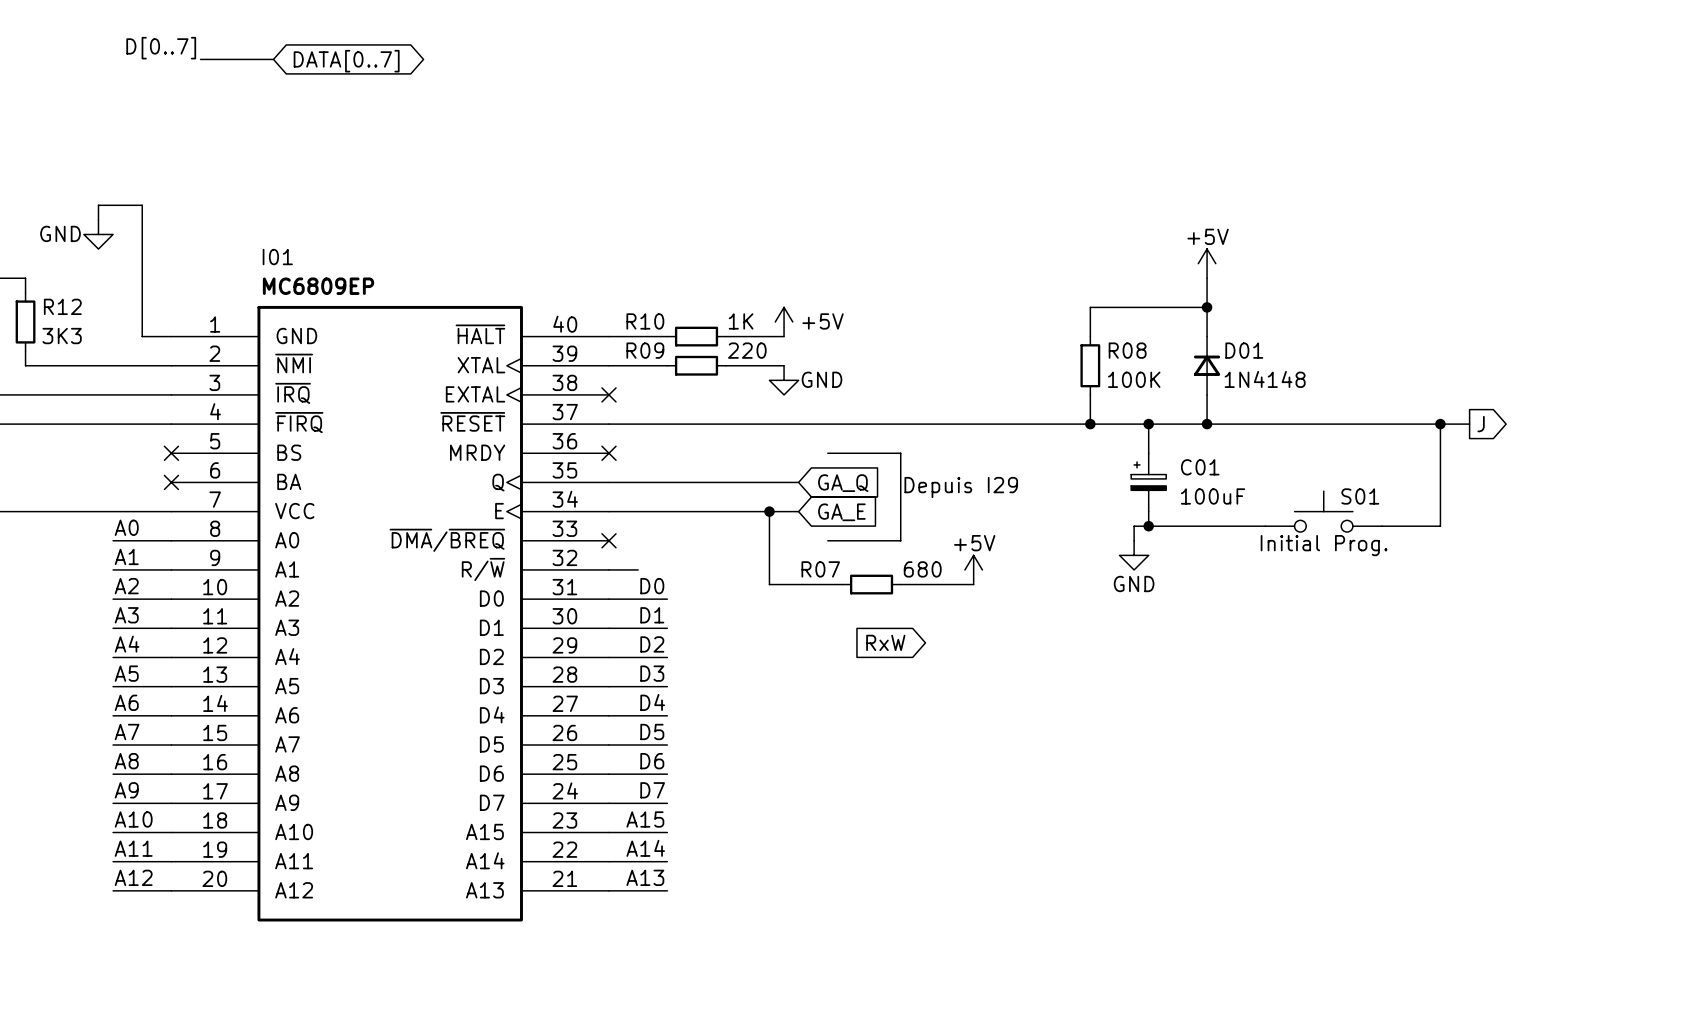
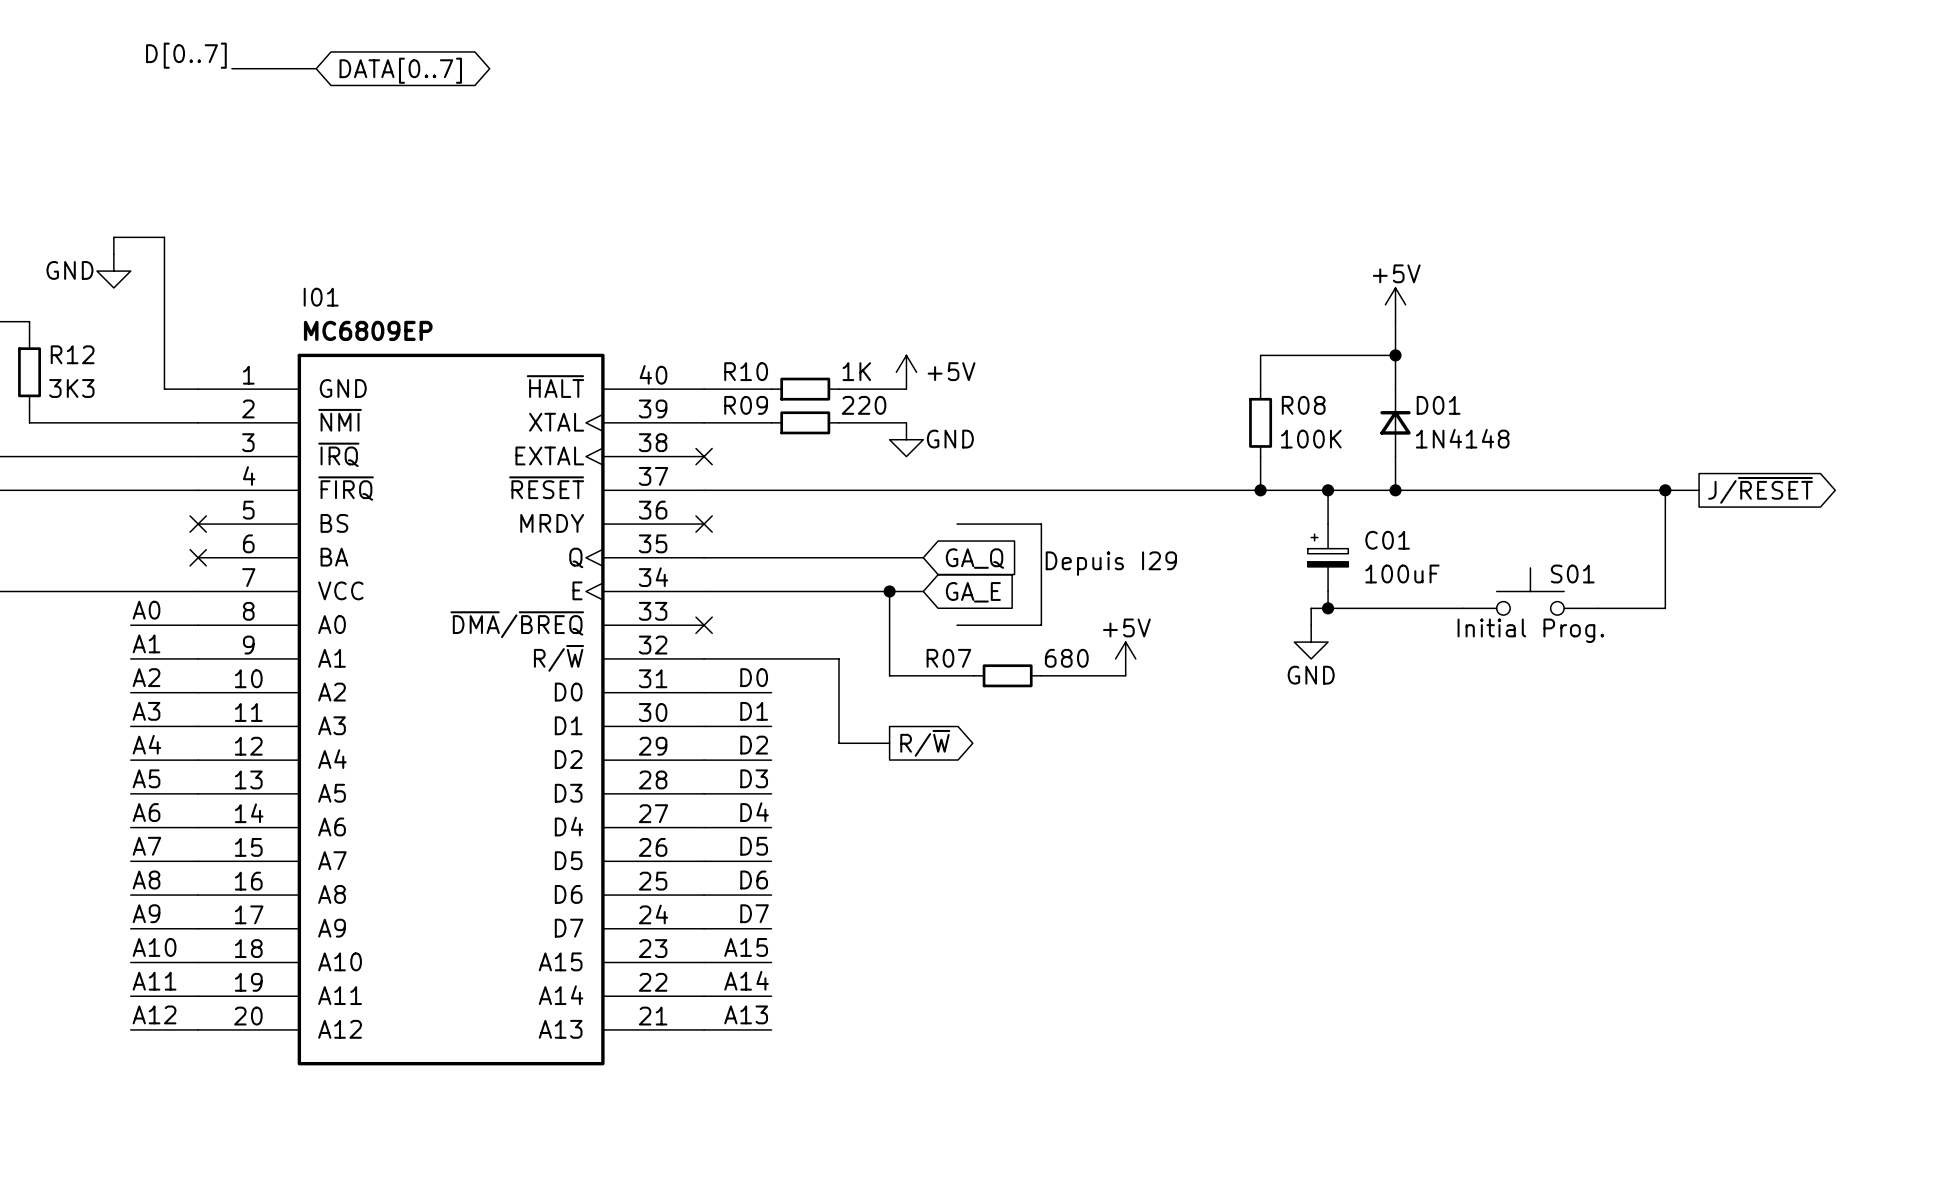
global label: J (1481, 424) -> J/~{RESET} (1760, 490)
wire: none -> (737, 658) (839, 658) (839, 743) (889, 743)
global label: none -> R/~{W} (925, 743)
global label: RxW (885, 642) -> none

